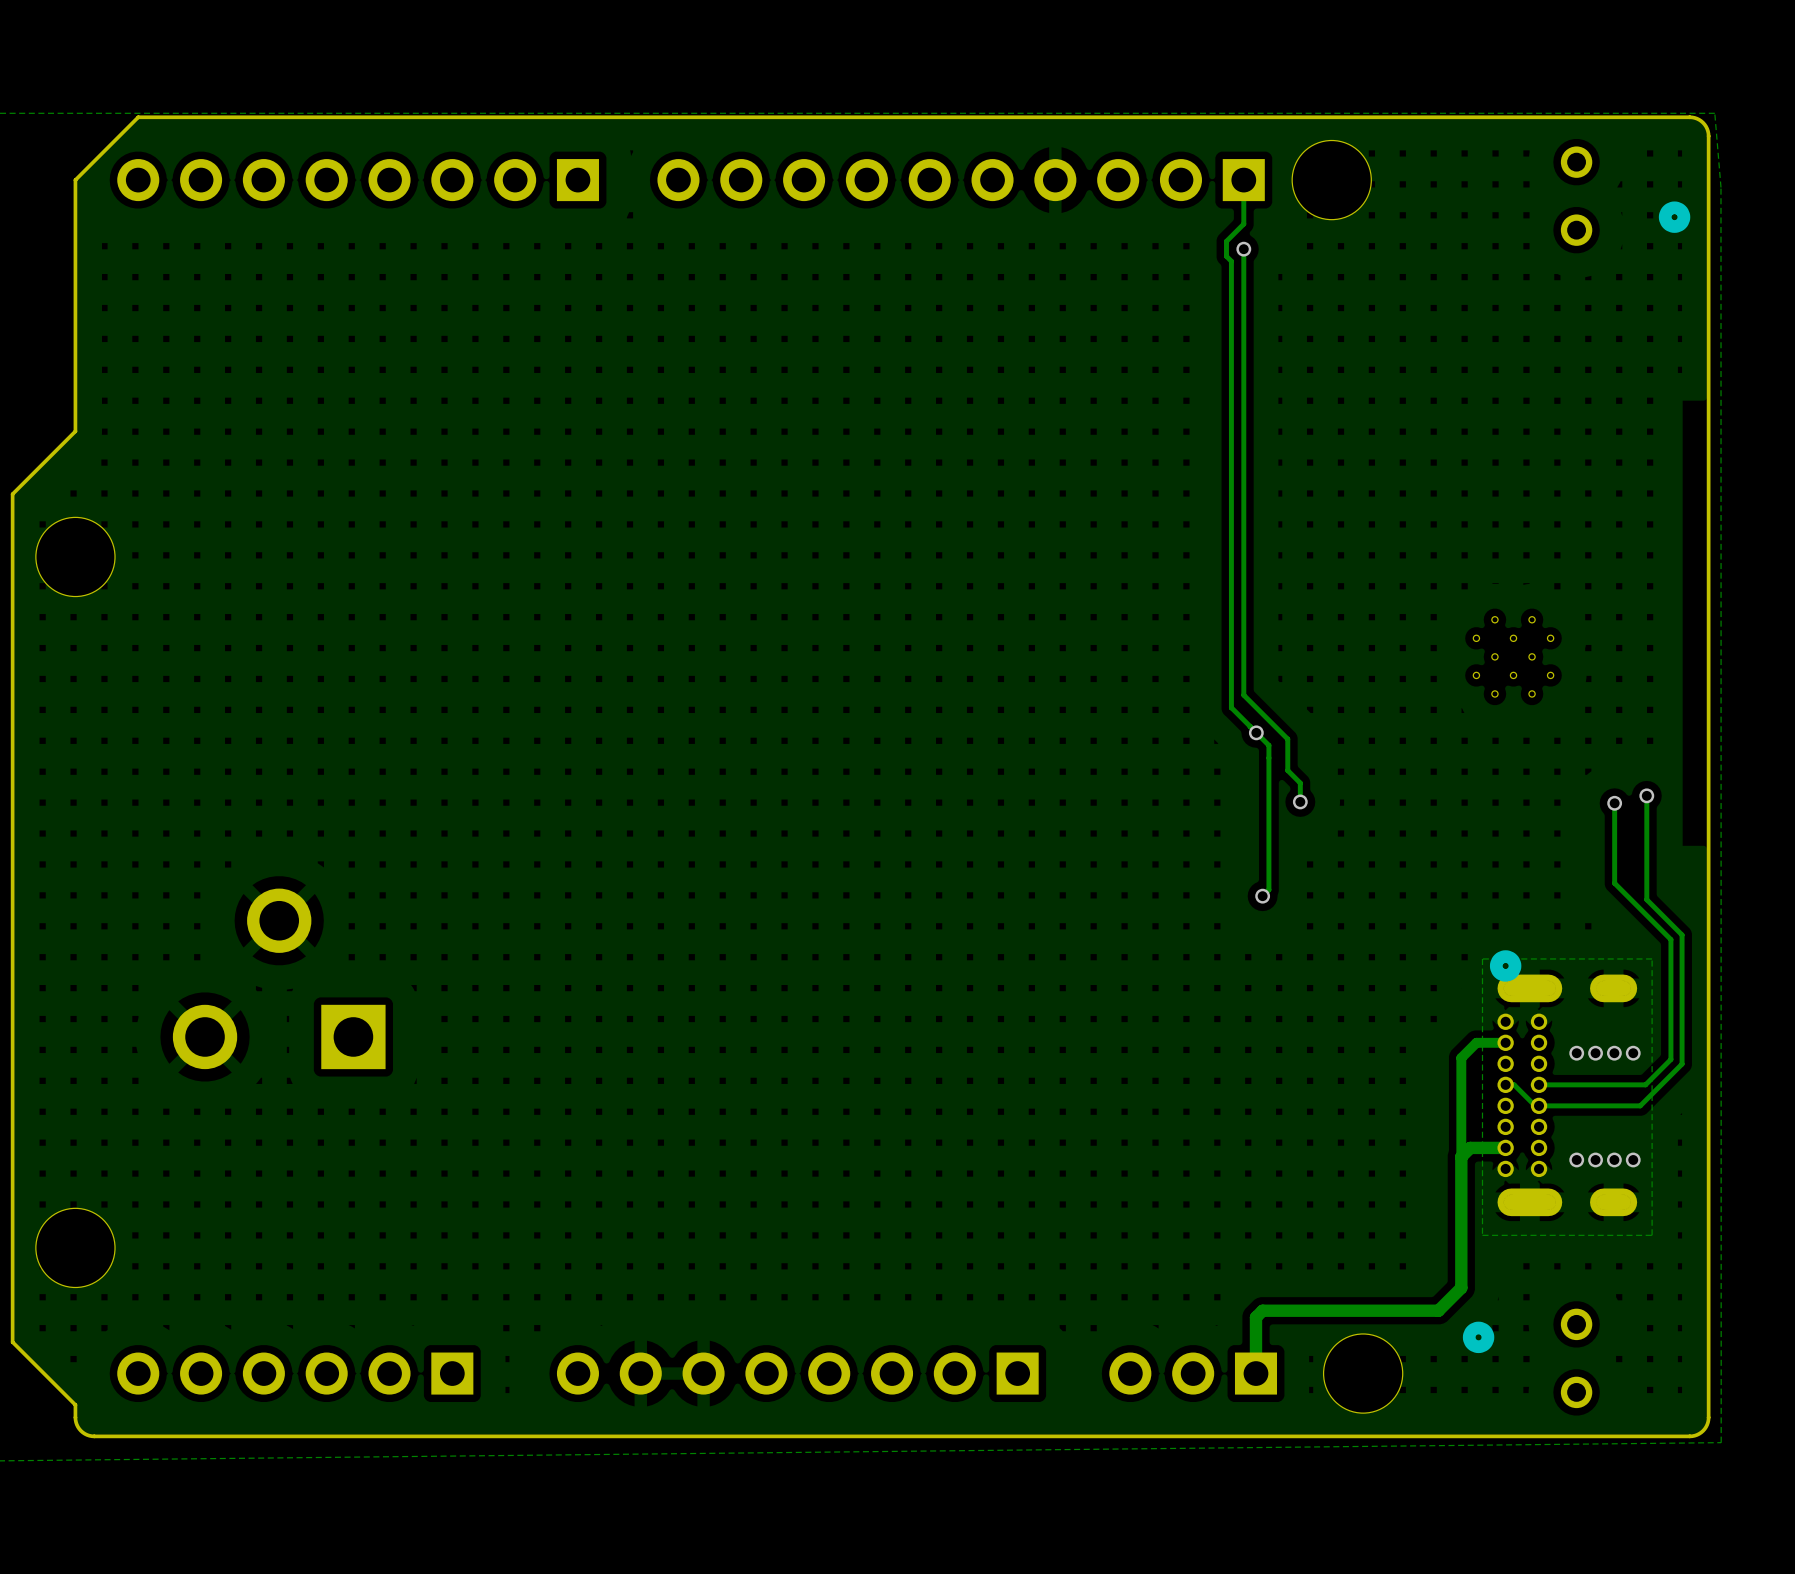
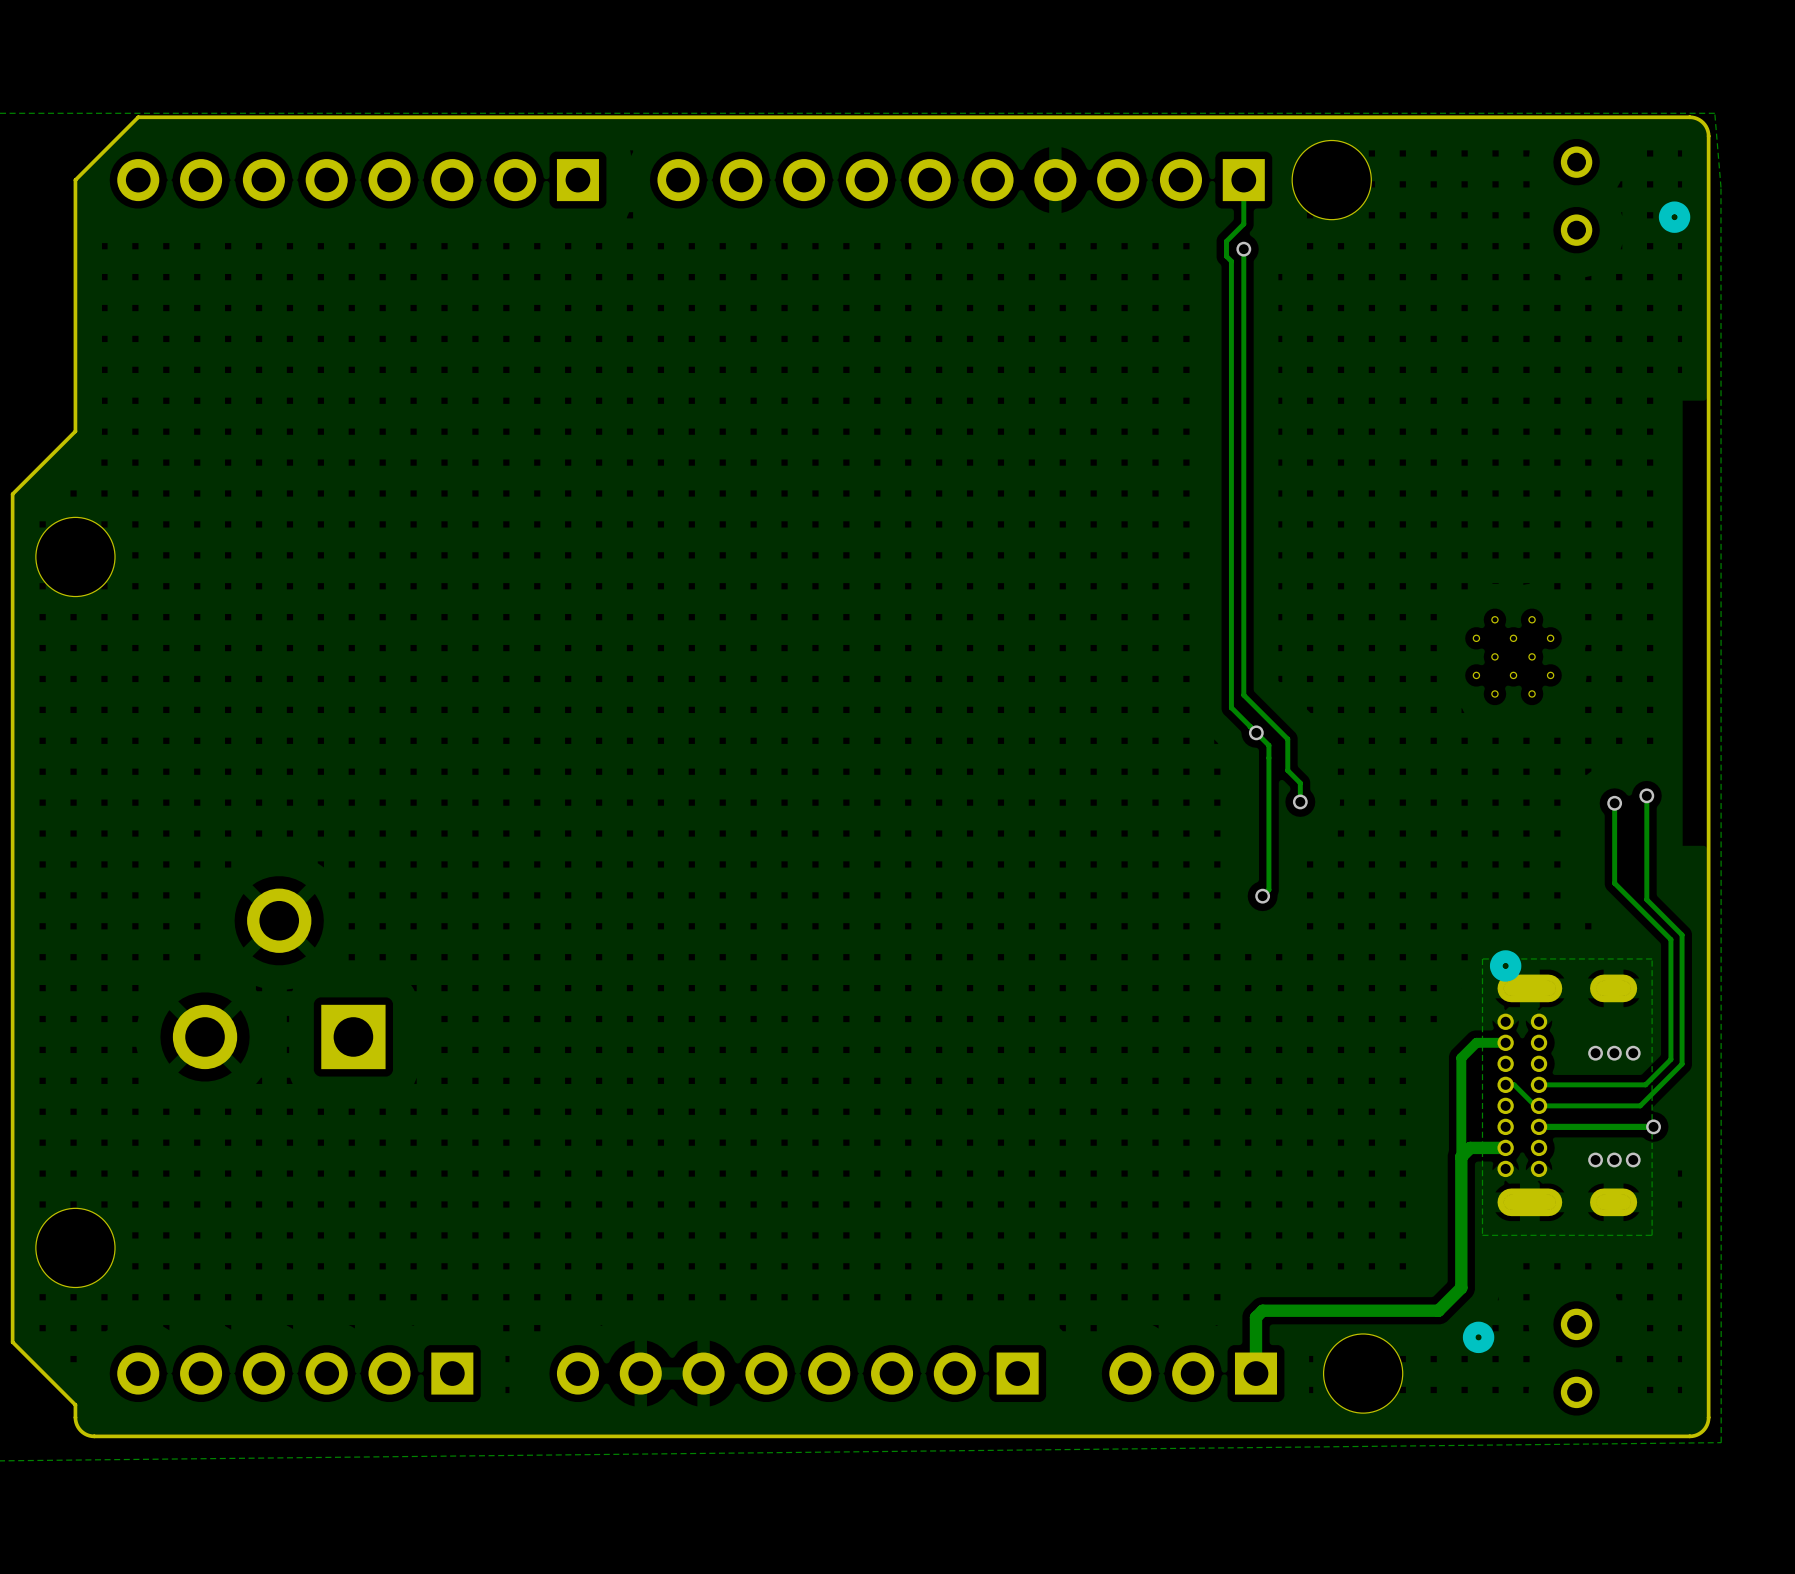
via: (1576, 1053) -> none
track: none -> (1653, 1126) (1539, 1126)
via: none -> (1653, 1126)
via: (1576, 1159) -> none

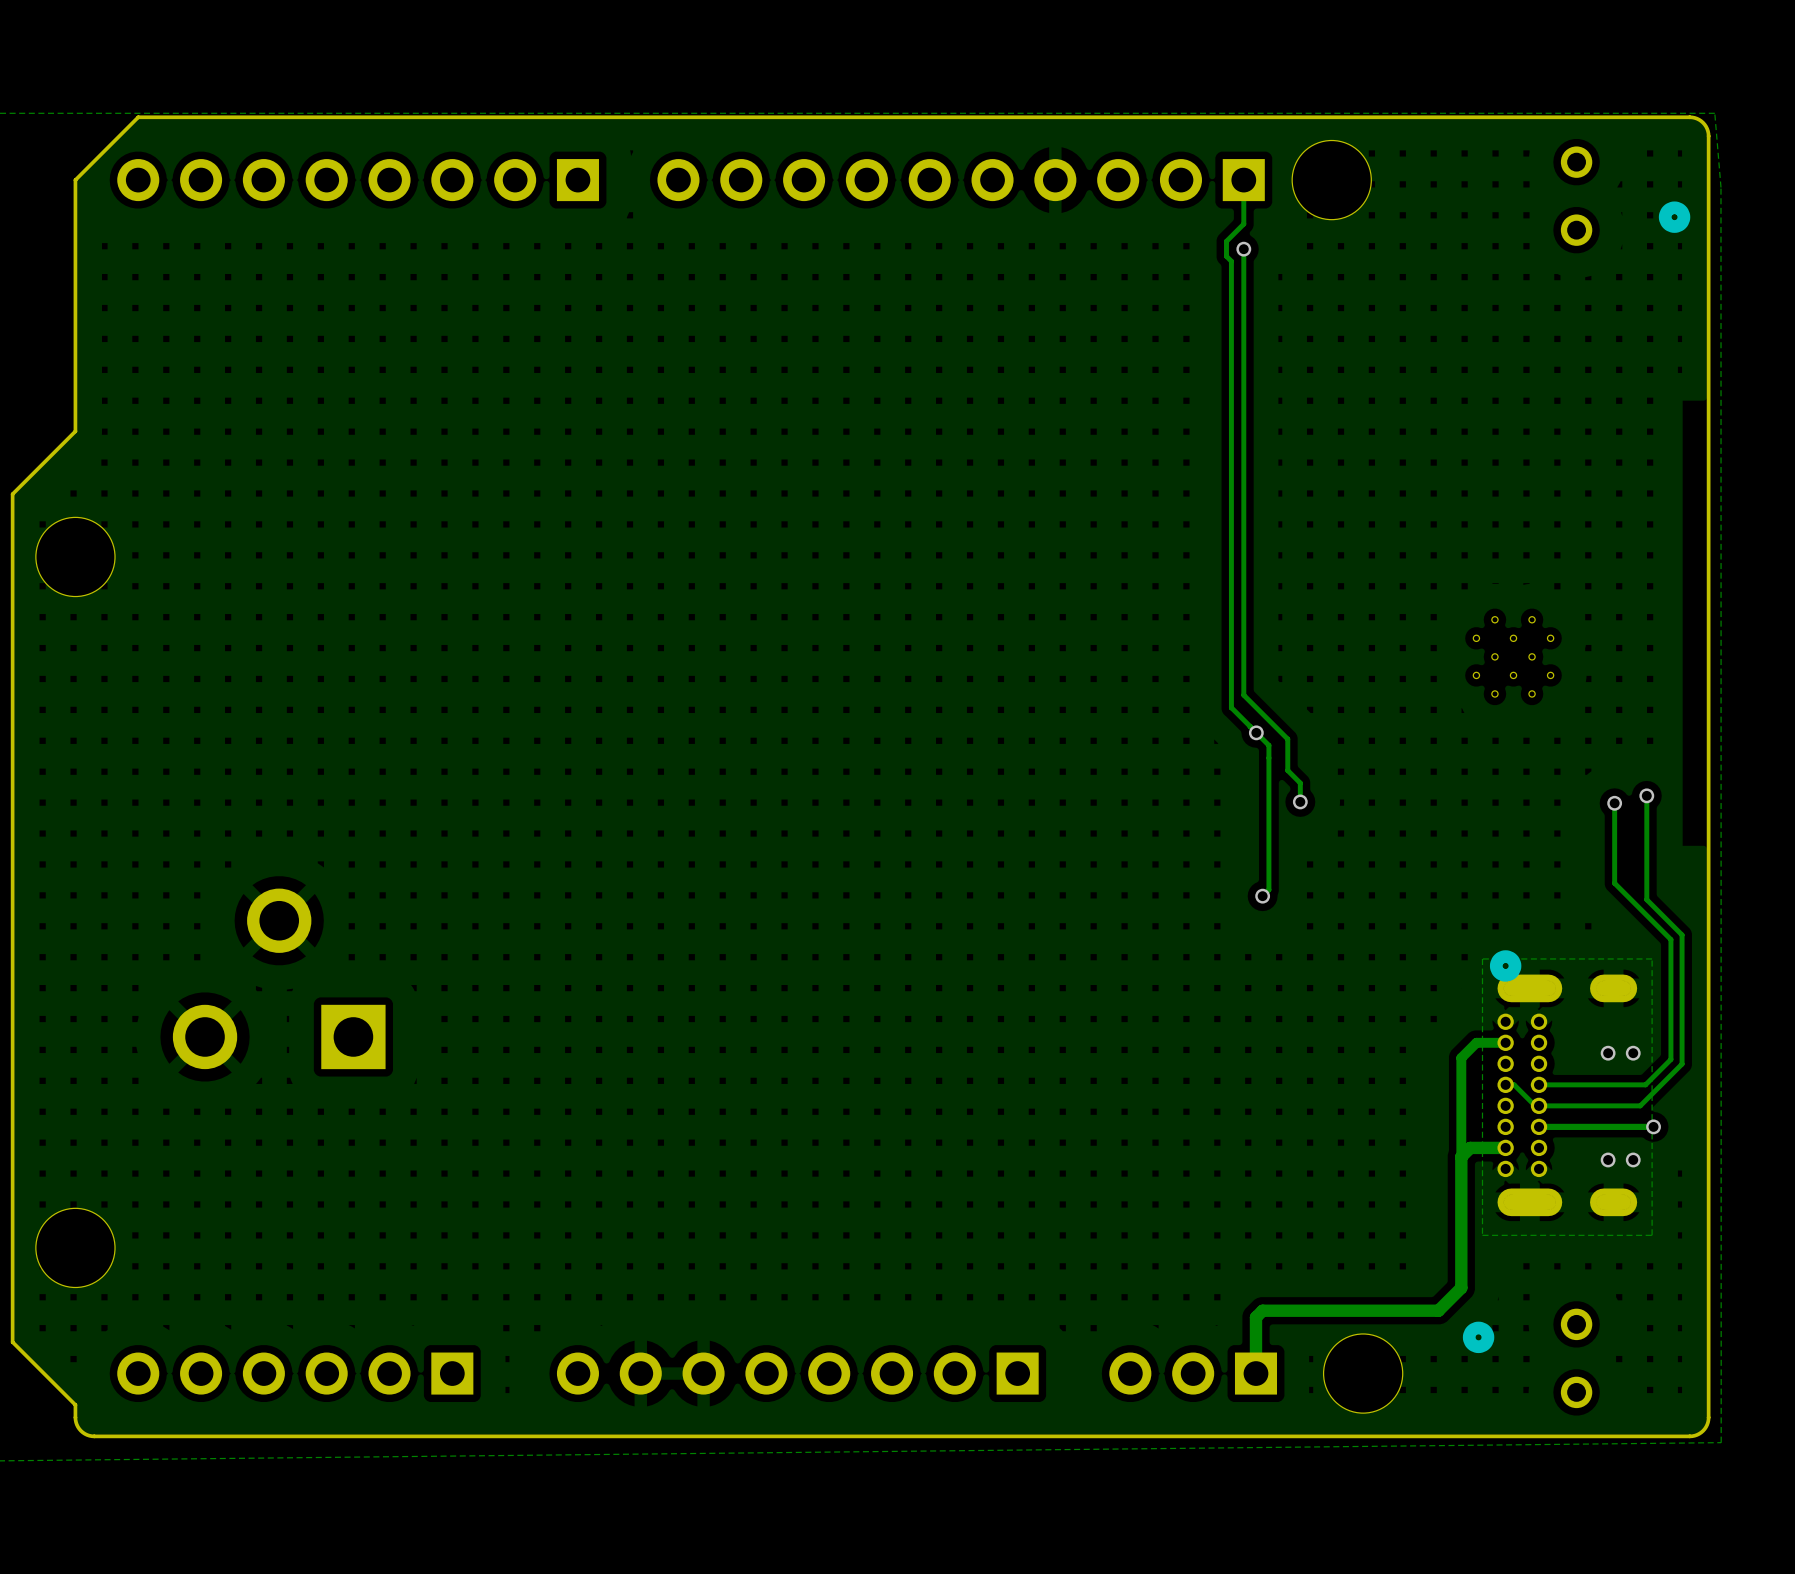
via: (1595, 1053) -> none
via: none -> (1608, 1053)
via: (1614, 1053) -> none
via: (1595, 1159) -> none
via: none -> (1608, 1159)
via: (1614, 1159) -> none

